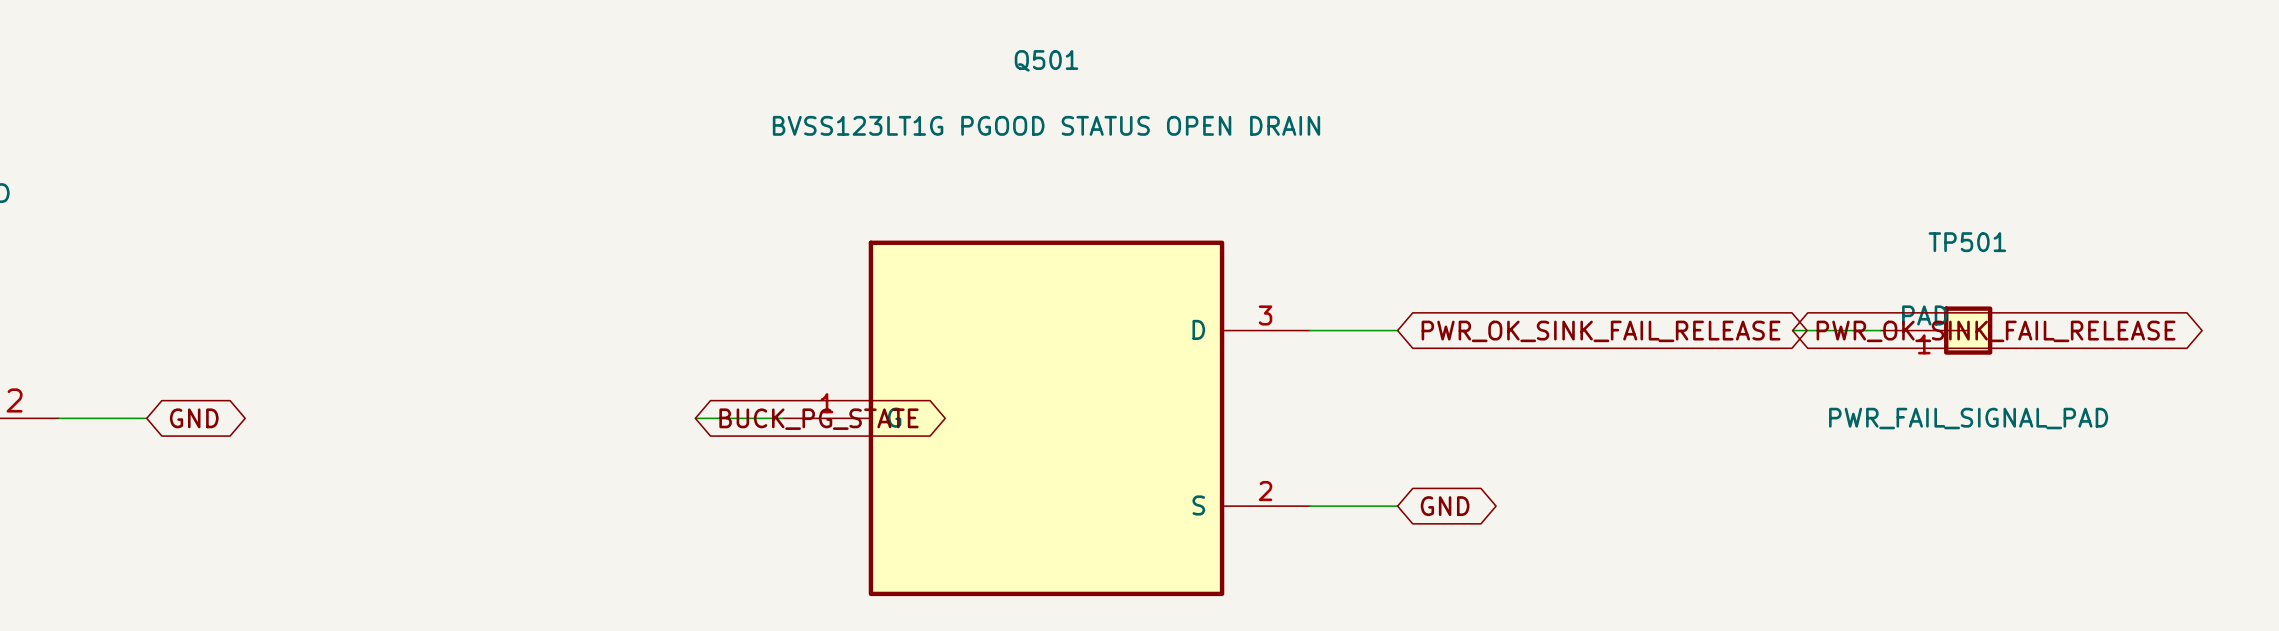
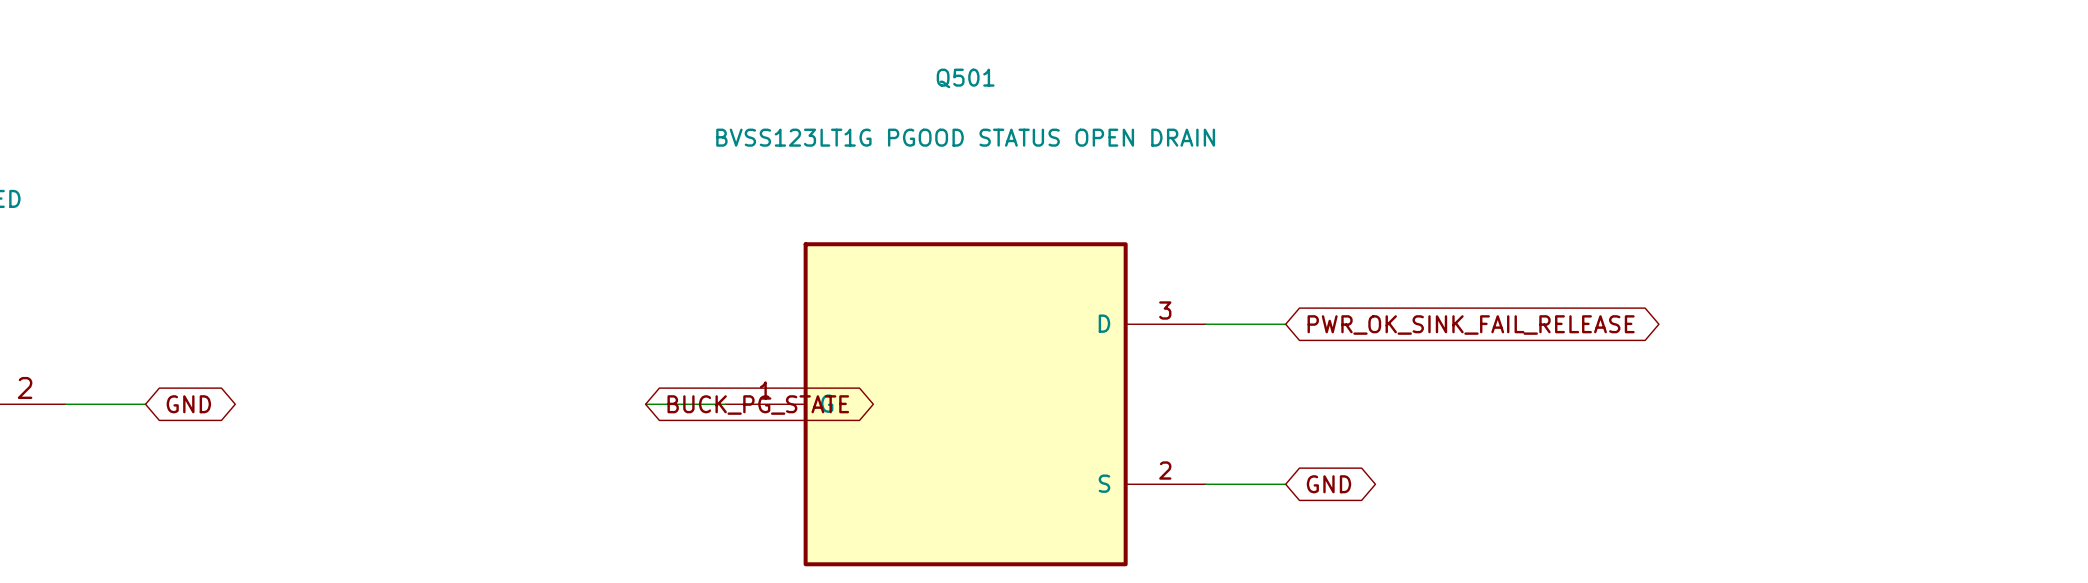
wire: (1792, 330) (1880, 330) -> none
TP501: PWR_FAIL_SIGNAL_PAD (1936, 330) -> none
global label: PWR_OK_SINK_FAIL_RELEASE (1996, 331) -> none

